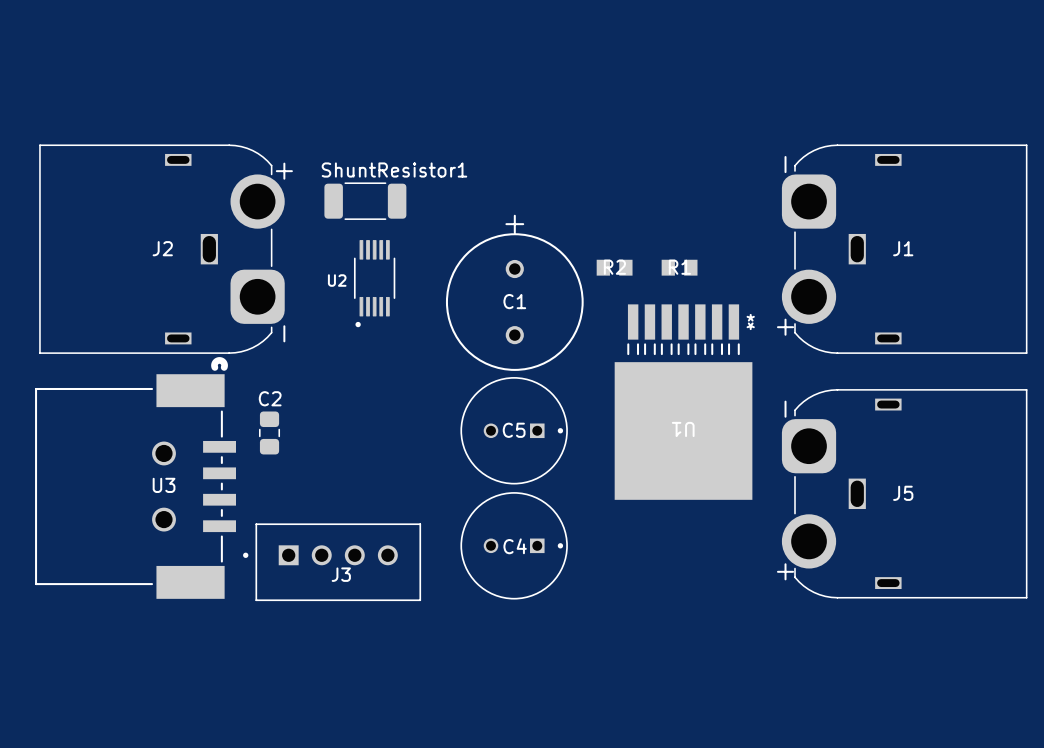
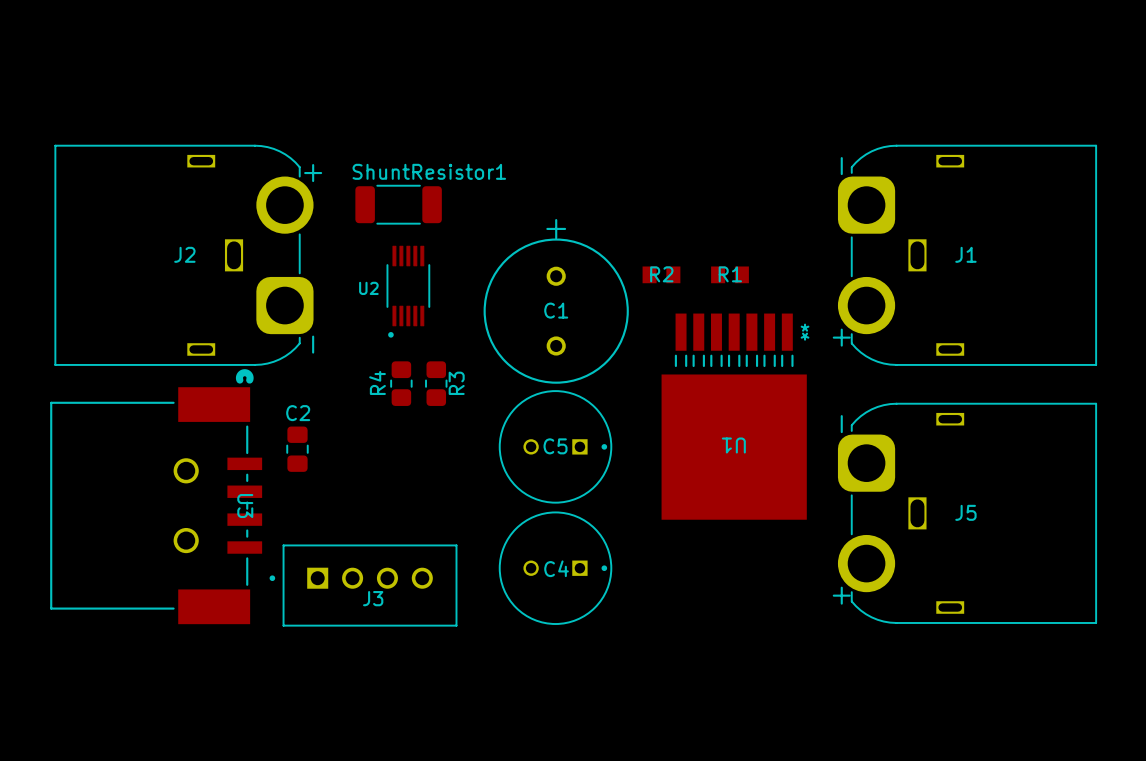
R4: none -> (401, 383)
R3: none -> (436, 383)
U3 name rotation: 0° (164, 485) -> 90° clockwise (245, 506)
U3 name position: U3 (164, 485) -> U3 (245, 506)

